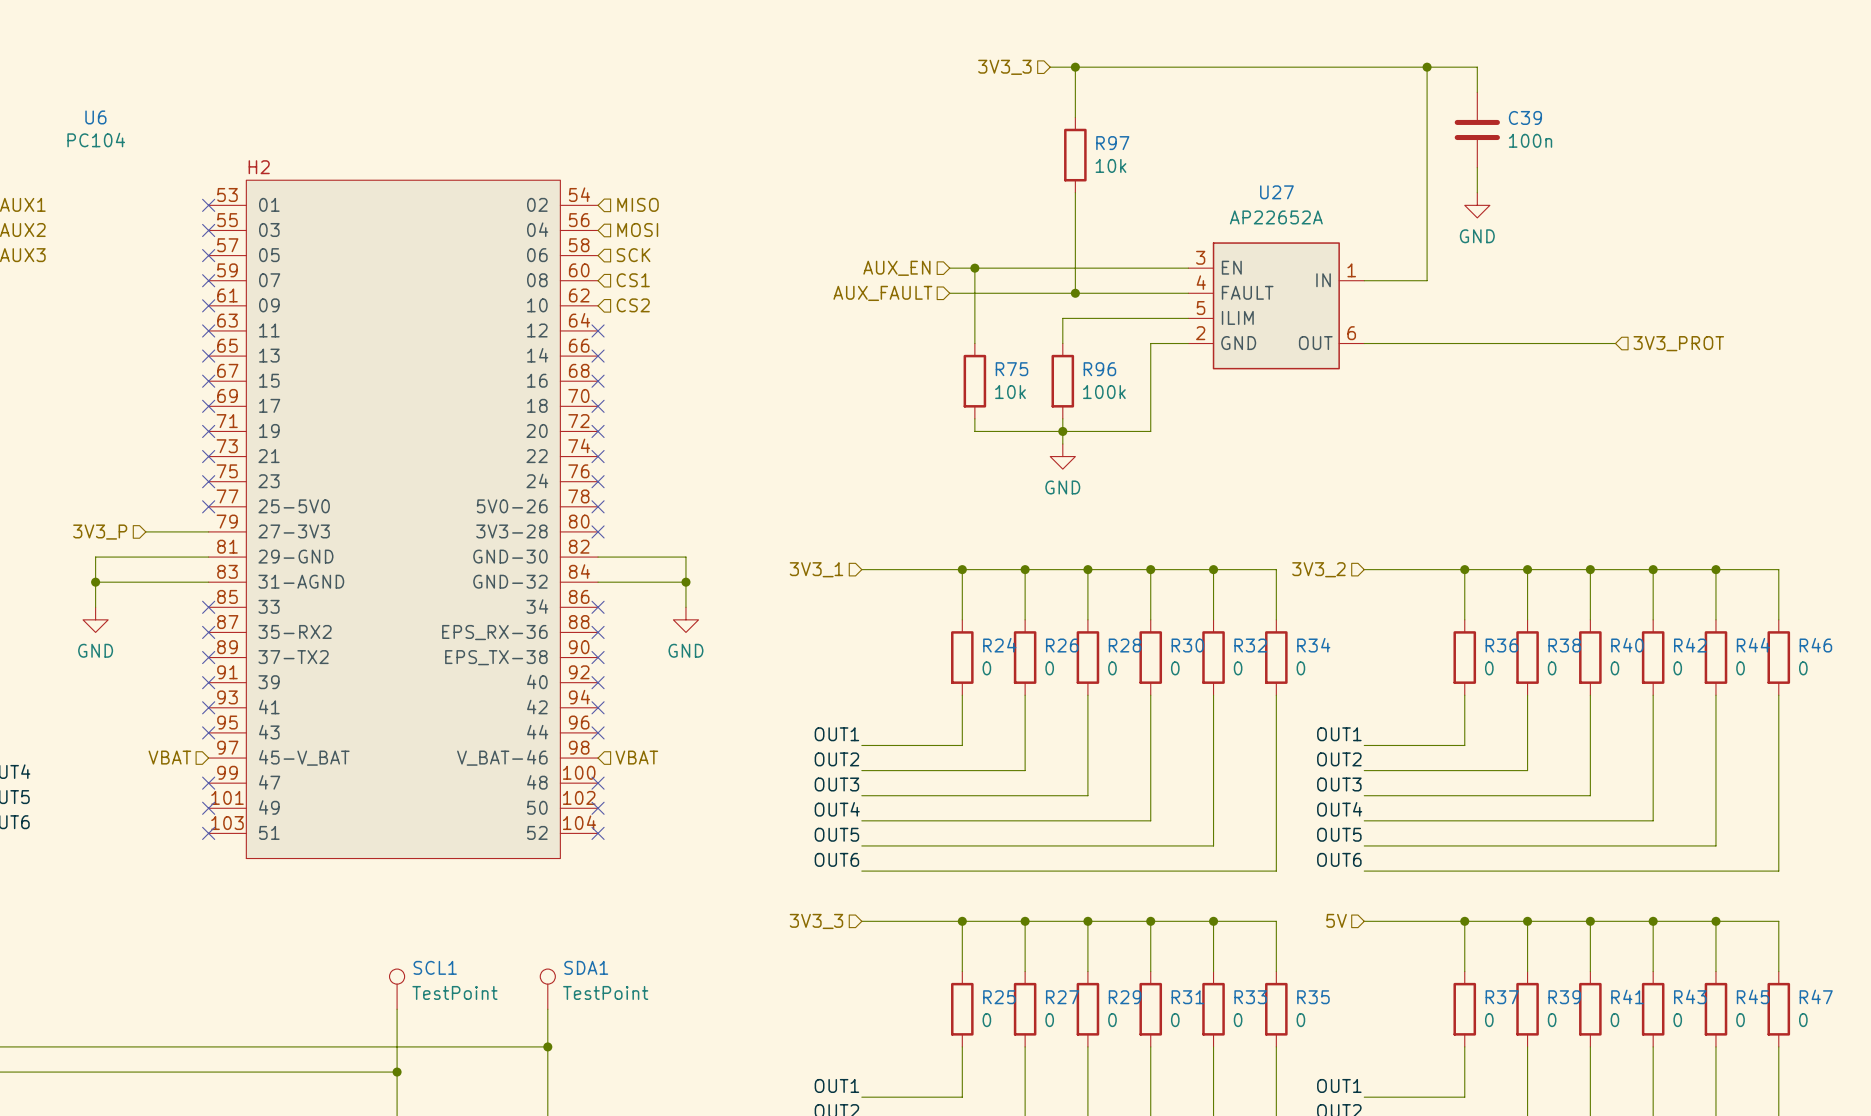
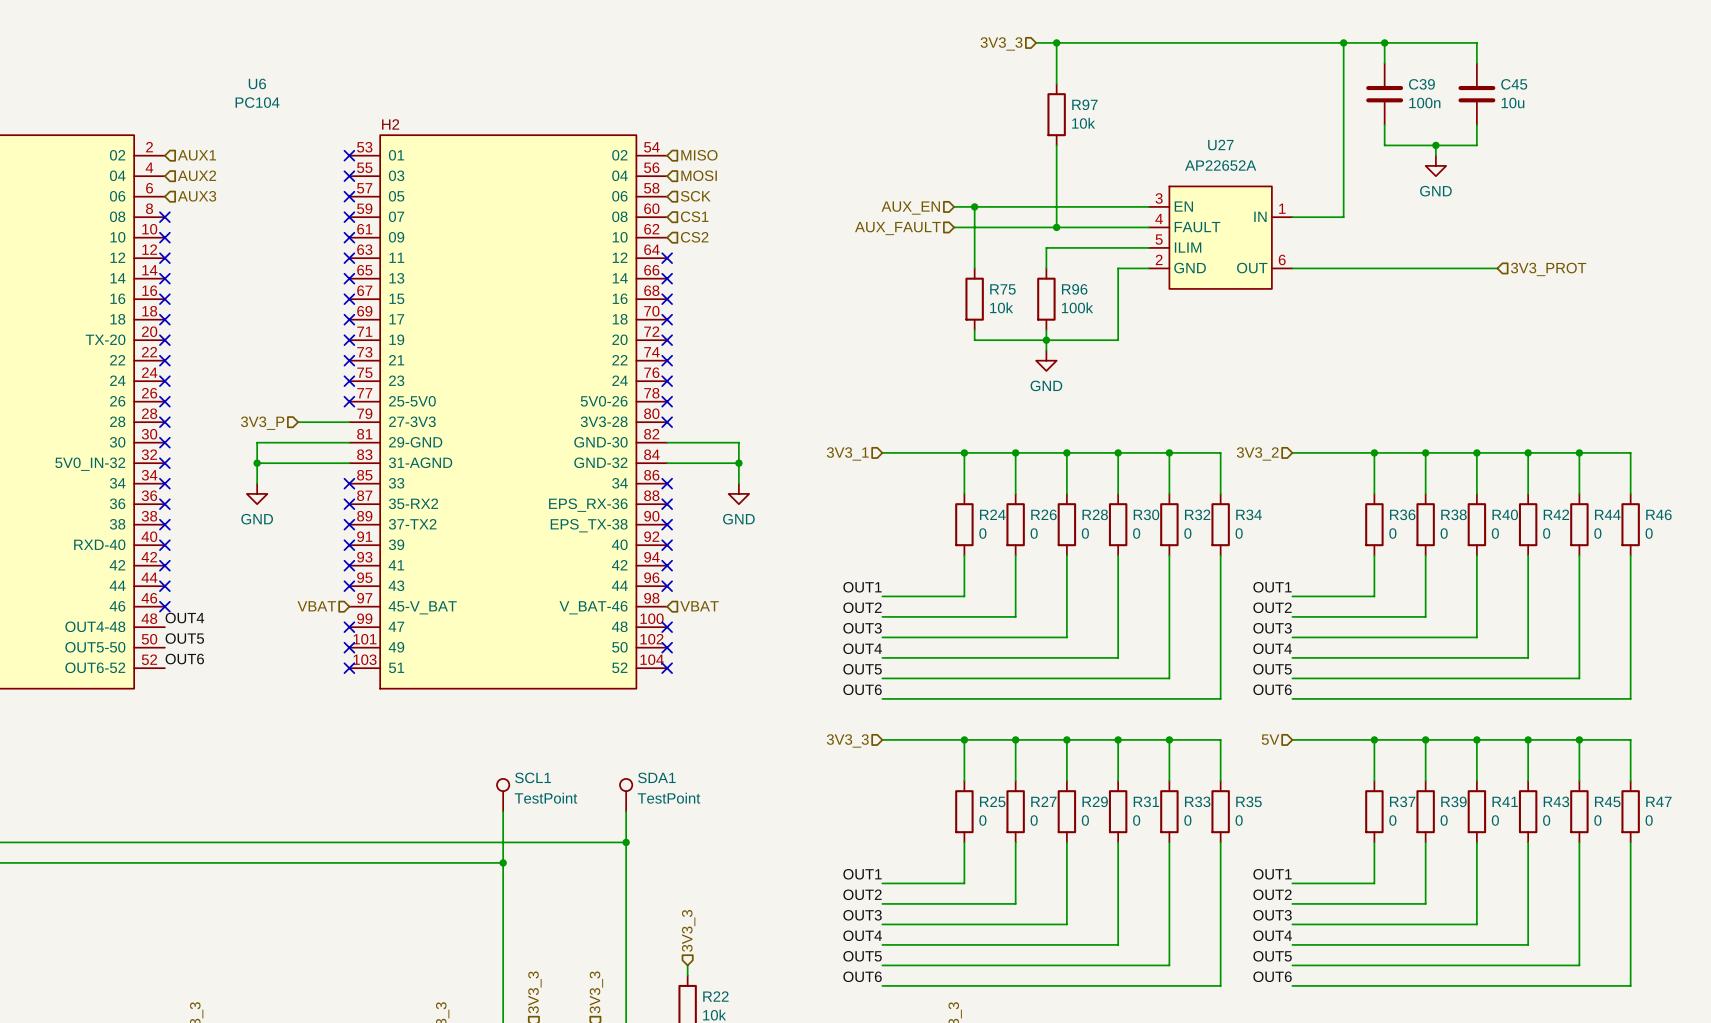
wire: none -> (1384, 42) (1476, 42) (1476, 63)
junction: none -> (1384, 42)
C45: none -> 10u (1476, 94)
wire: none -> (1476, 124) (1476, 145) (1384, 145)
wire: none -> (1435, 145) (1435, 155)
junction: none -> (1435, 145)
power symbol position: GND (1477, 205) -> GND (1435, 165)

